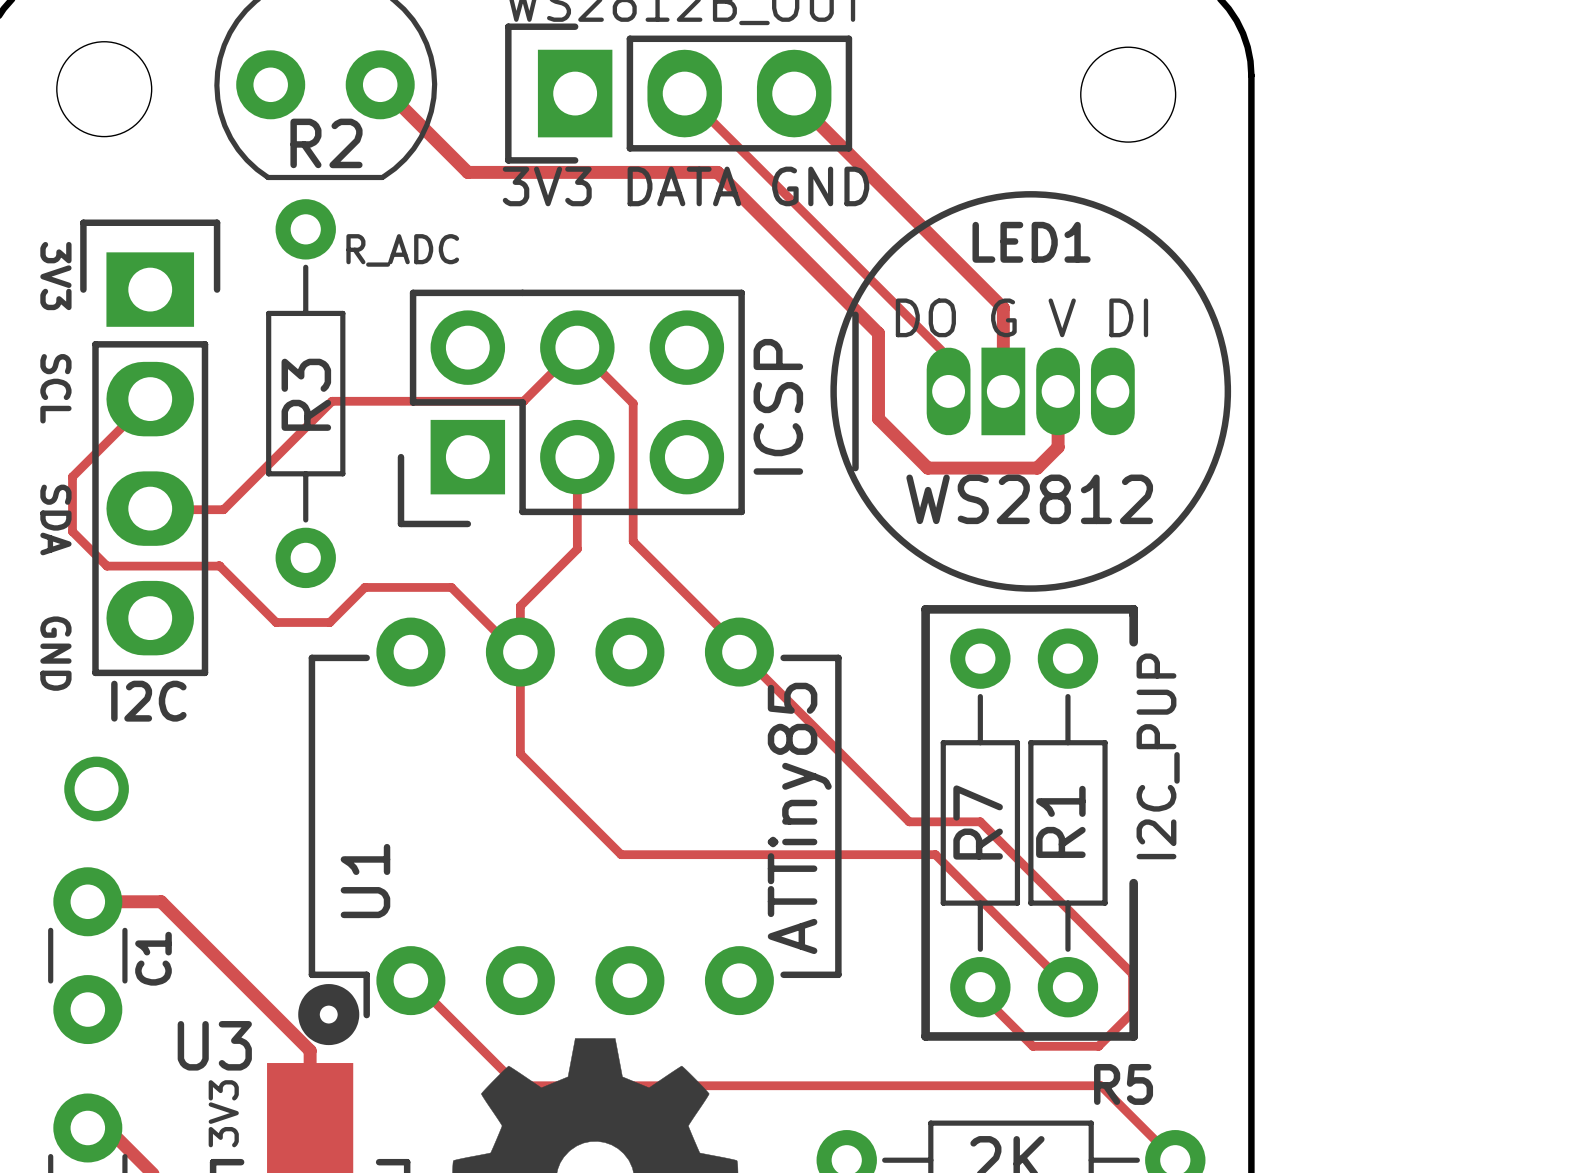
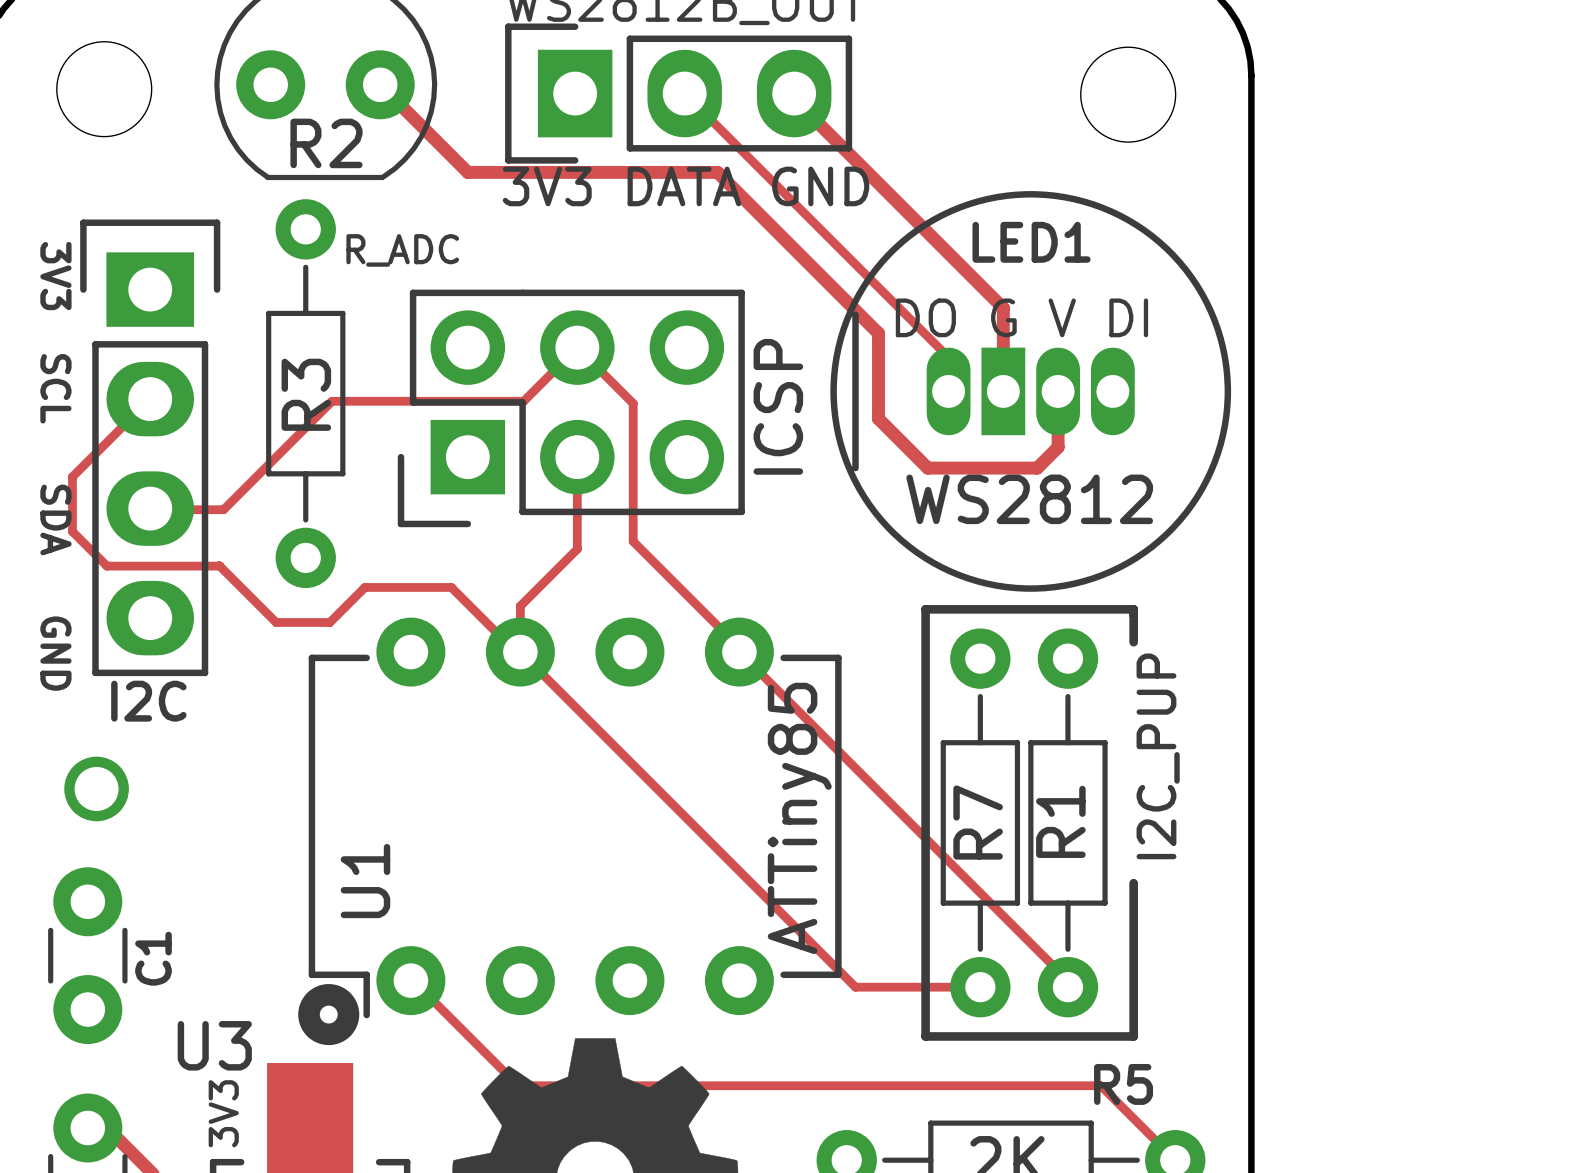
track: (520, 652) (520, 753) (621, 854) (935, 854) (1067, 987) -> (520, 652) (855, 987) (980, 987)
track: (909, 821) (980, 821) (1132, 974) (1132, 1012) (1098, 1046) (1032, 1046) (980, 993) -> (909, 821) (1067, 980) (1067, 987)
track: (87, 901) (161, 901) (310, 1050) (310, 1149) -> none

